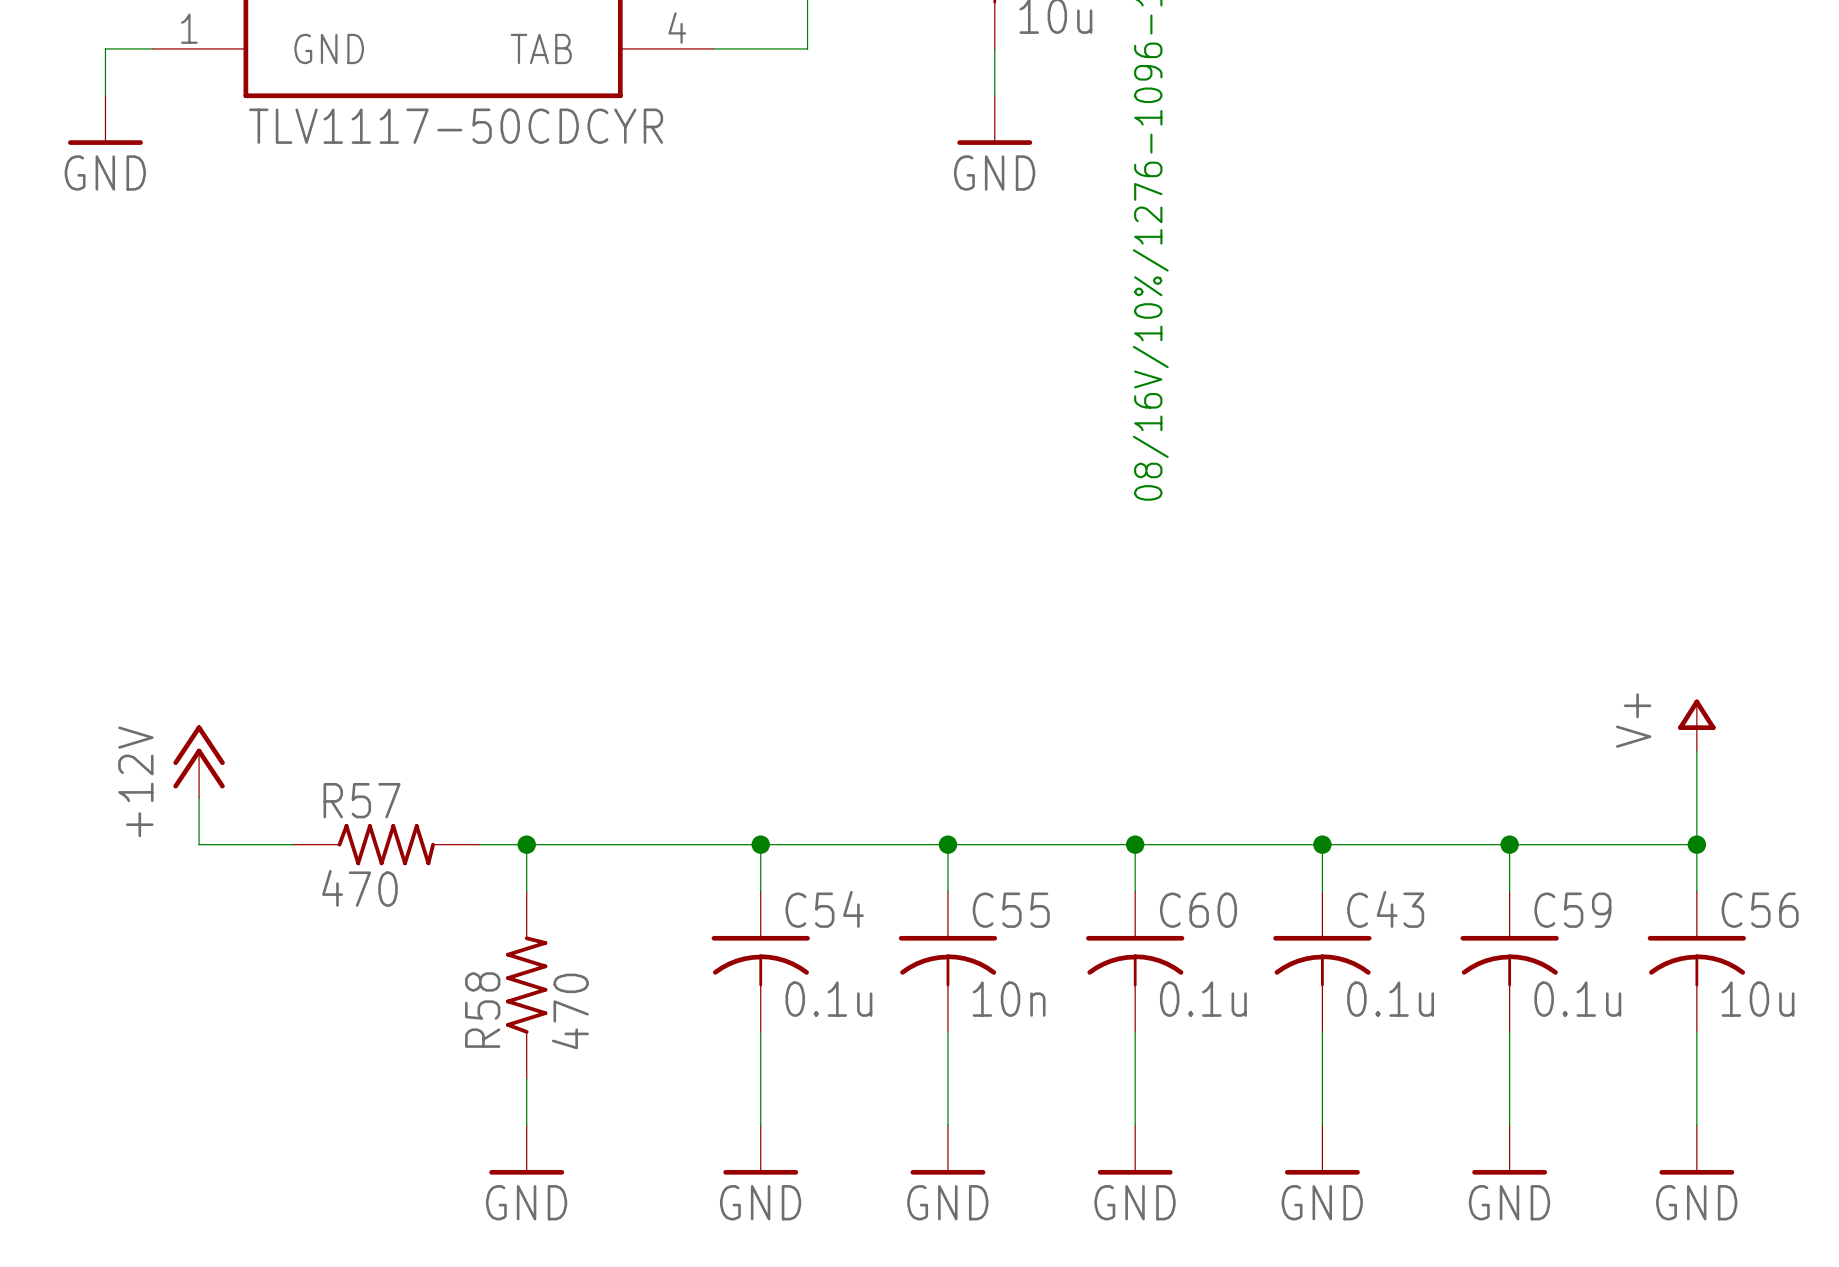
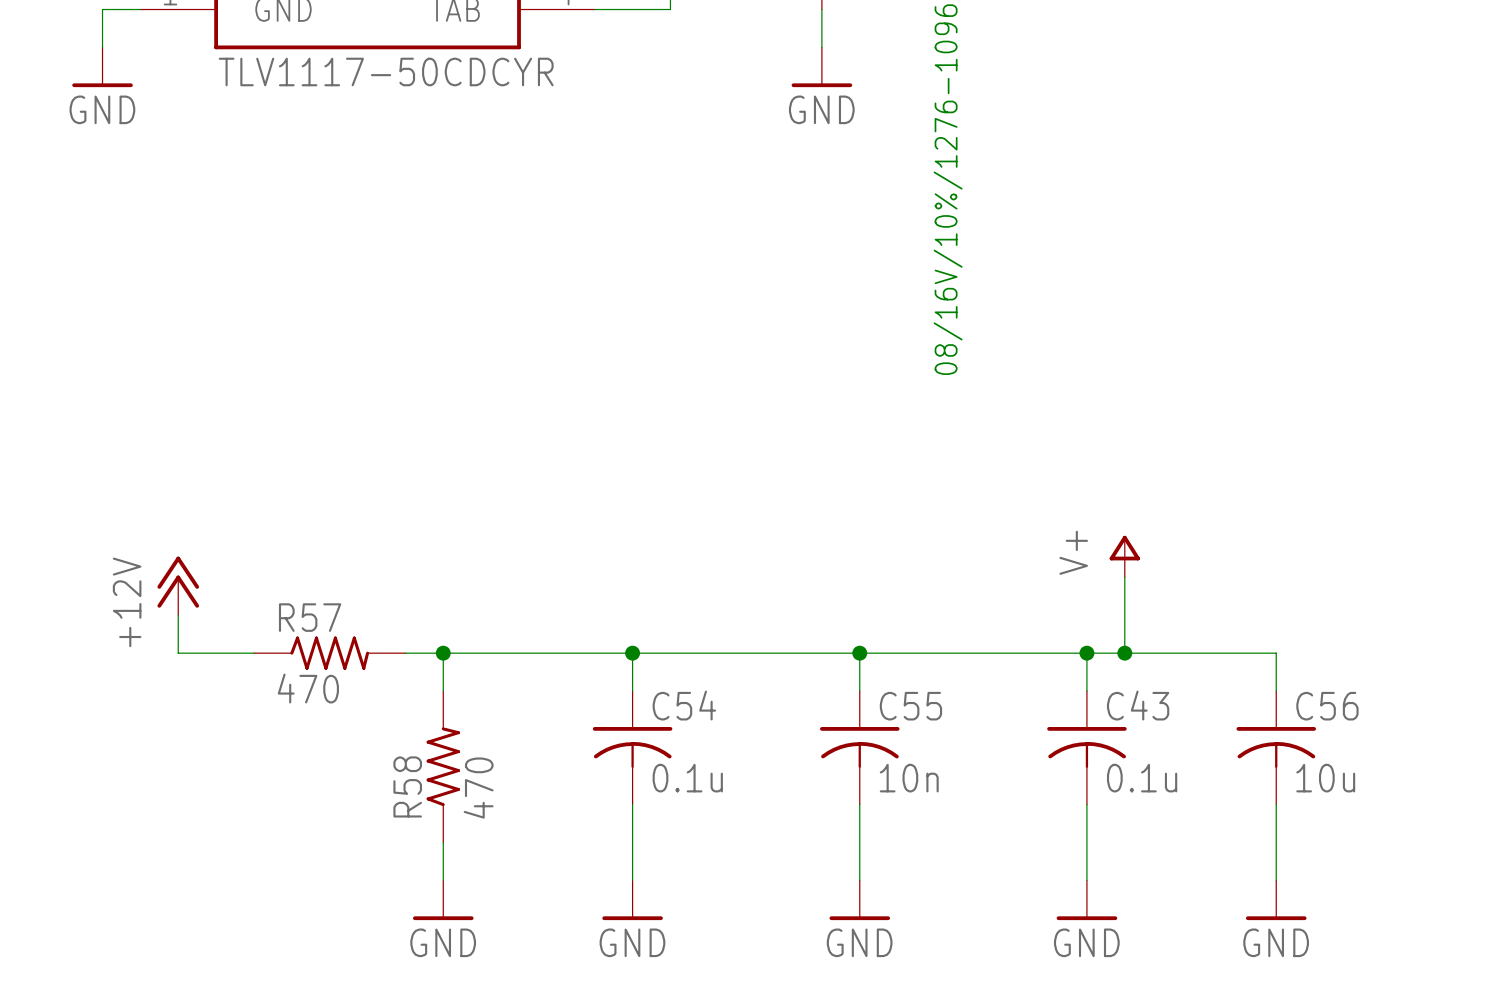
power symbol position: V+ (1696, 725) -> V+ (1124, 556)
wire: (1696, 751) (1696, 891) -> none
wire: (947, 844) (947, 891) -> (859, 653) (859, 691)
junction: (947, 844) -> none
junction: none -> (859, 653)
wire: (1135, 844) (1135, 891) -> none
junction: (1135, 844) -> none
junction: none -> (1124, 653)
wire: (1509, 844) (1509, 891) -> none
junction: (1509, 844) -> none
wire: (1556, 844) (1696, 844) -> (1276, 653) (1276, 691)
junction: (1696, 844) -> none
C55 position: (947, 961) -> (859, 747)
C60: 0.1u (1135, 961) -> none
C59: 0.1u (1509, 961) -> none
C56 position: (1696, 961) -> (1276, 747)
wire: (947, 1031) (947, 1125) -> (859, 804) (859, 880)
wire: (1135, 1031) (1135, 1125) -> (1124, 577) (1124, 653)
wire: (1509, 1031) (1509, 1125) -> (1276, 804) (1276, 880)
wire: (1696, 1031) (1696, 1125) -> none
power symbol: GND (947, 1150) -> none
power symbol: none -> GND (859, 900)
power symbol: GND (1135, 1150) -> none
power symbol position: GND (1509, 1150) -> GND (1276, 900)
power symbol: GND (1696, 1150) -> none

